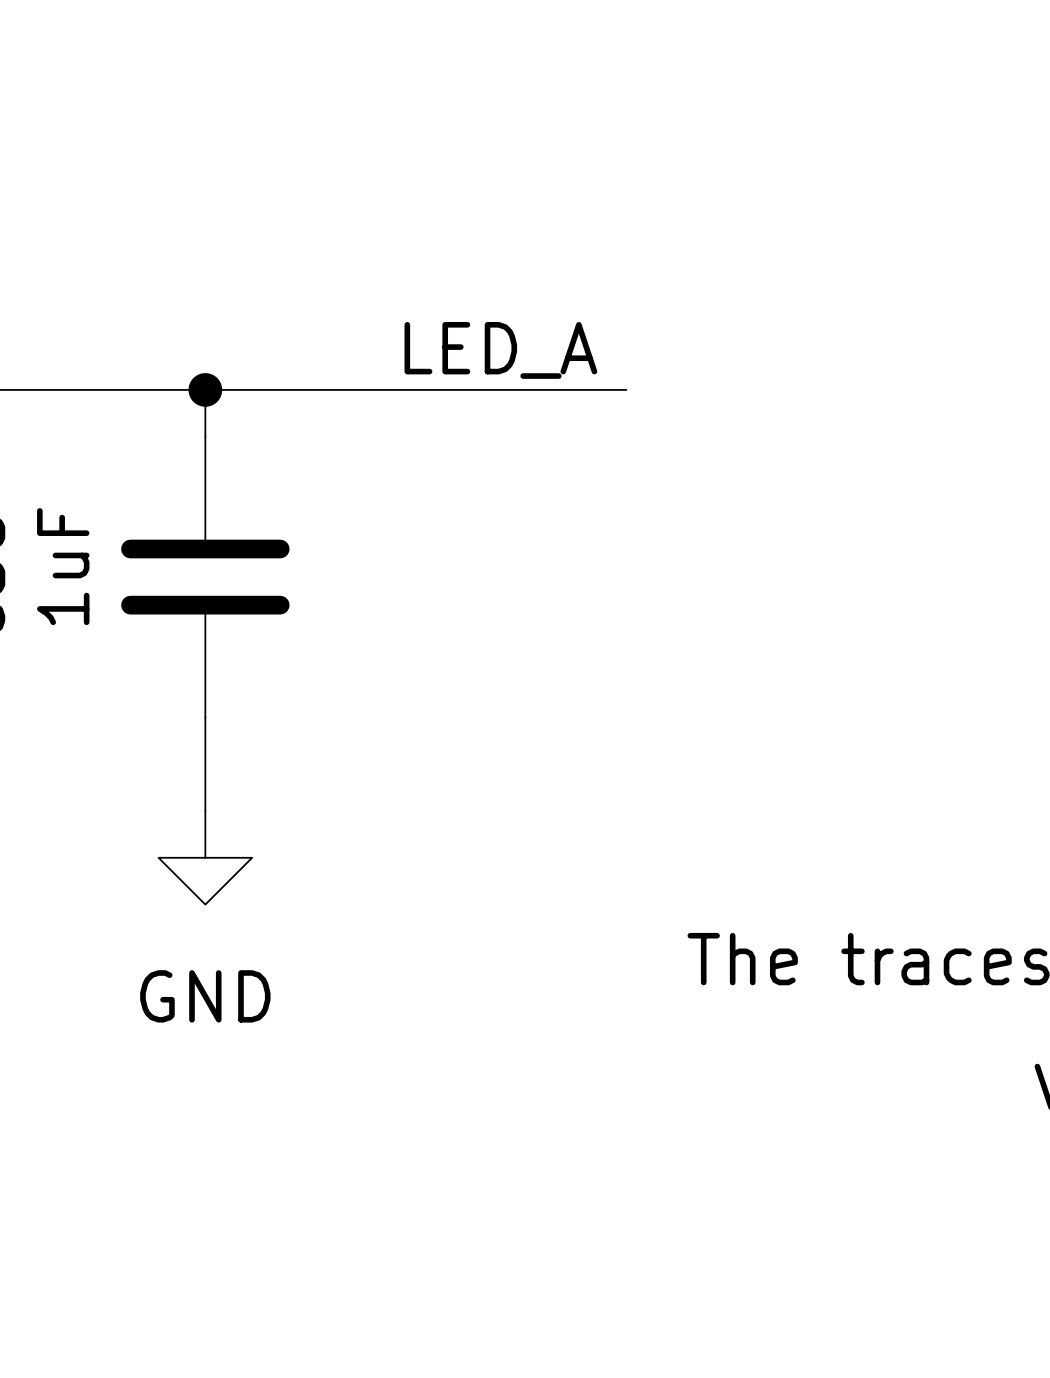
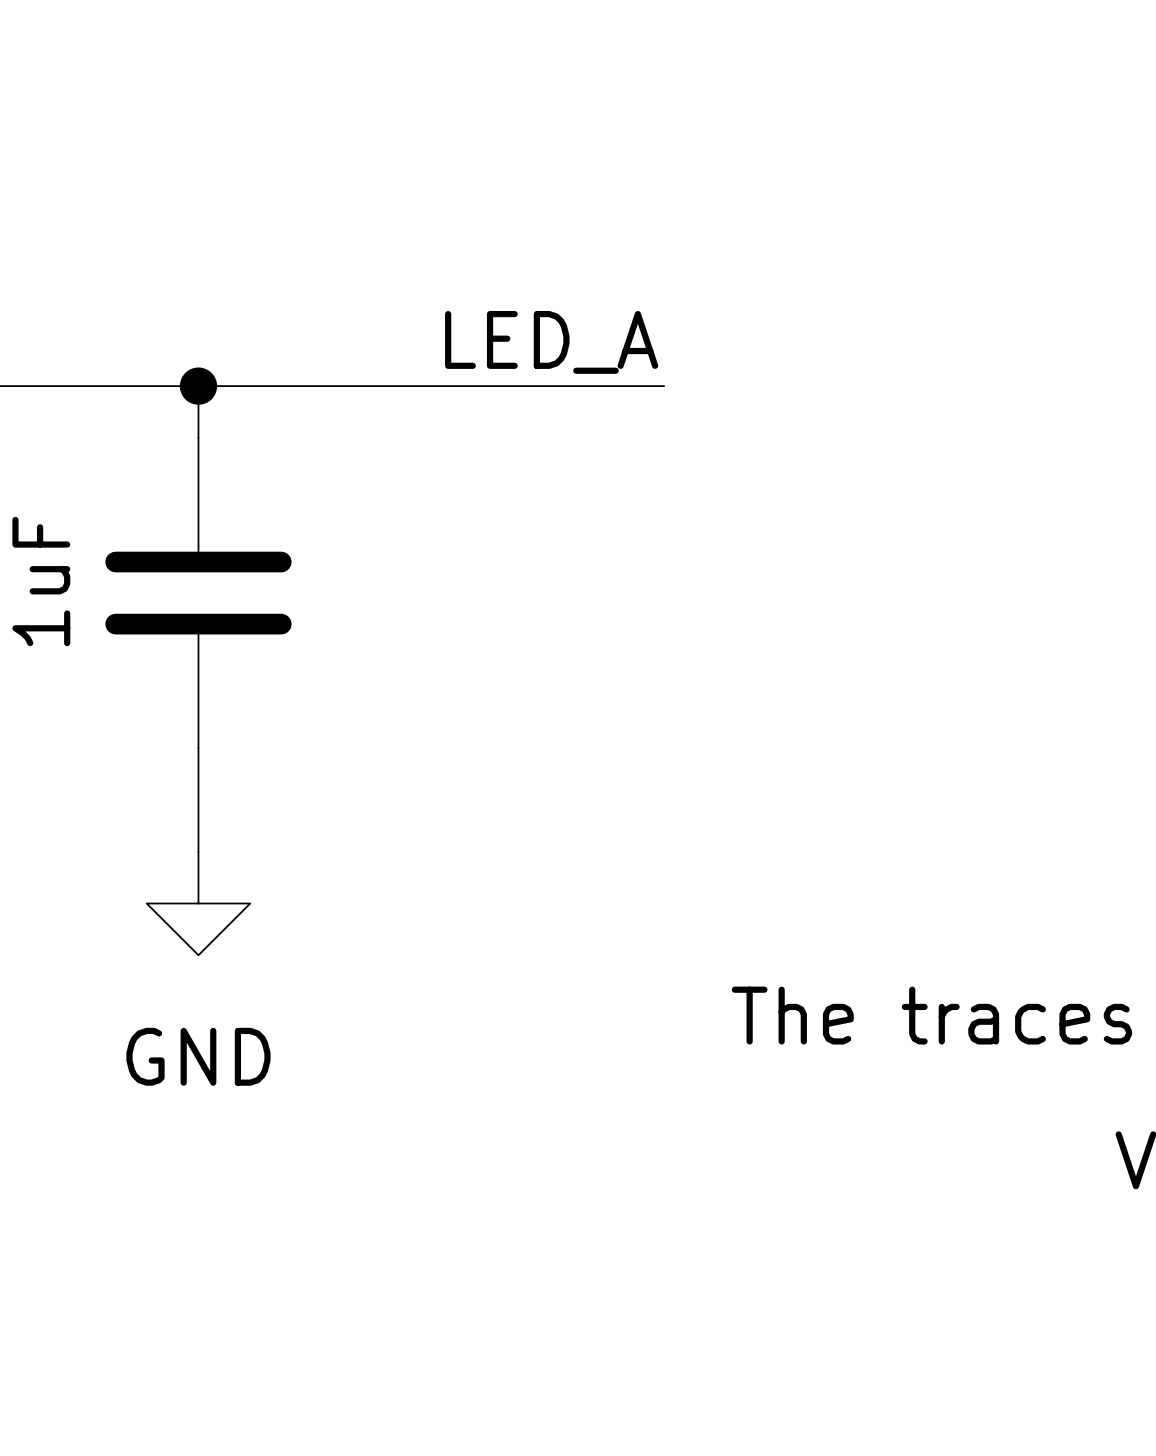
label position: LED_A (500, 350) -> LED_A (551, 342)

